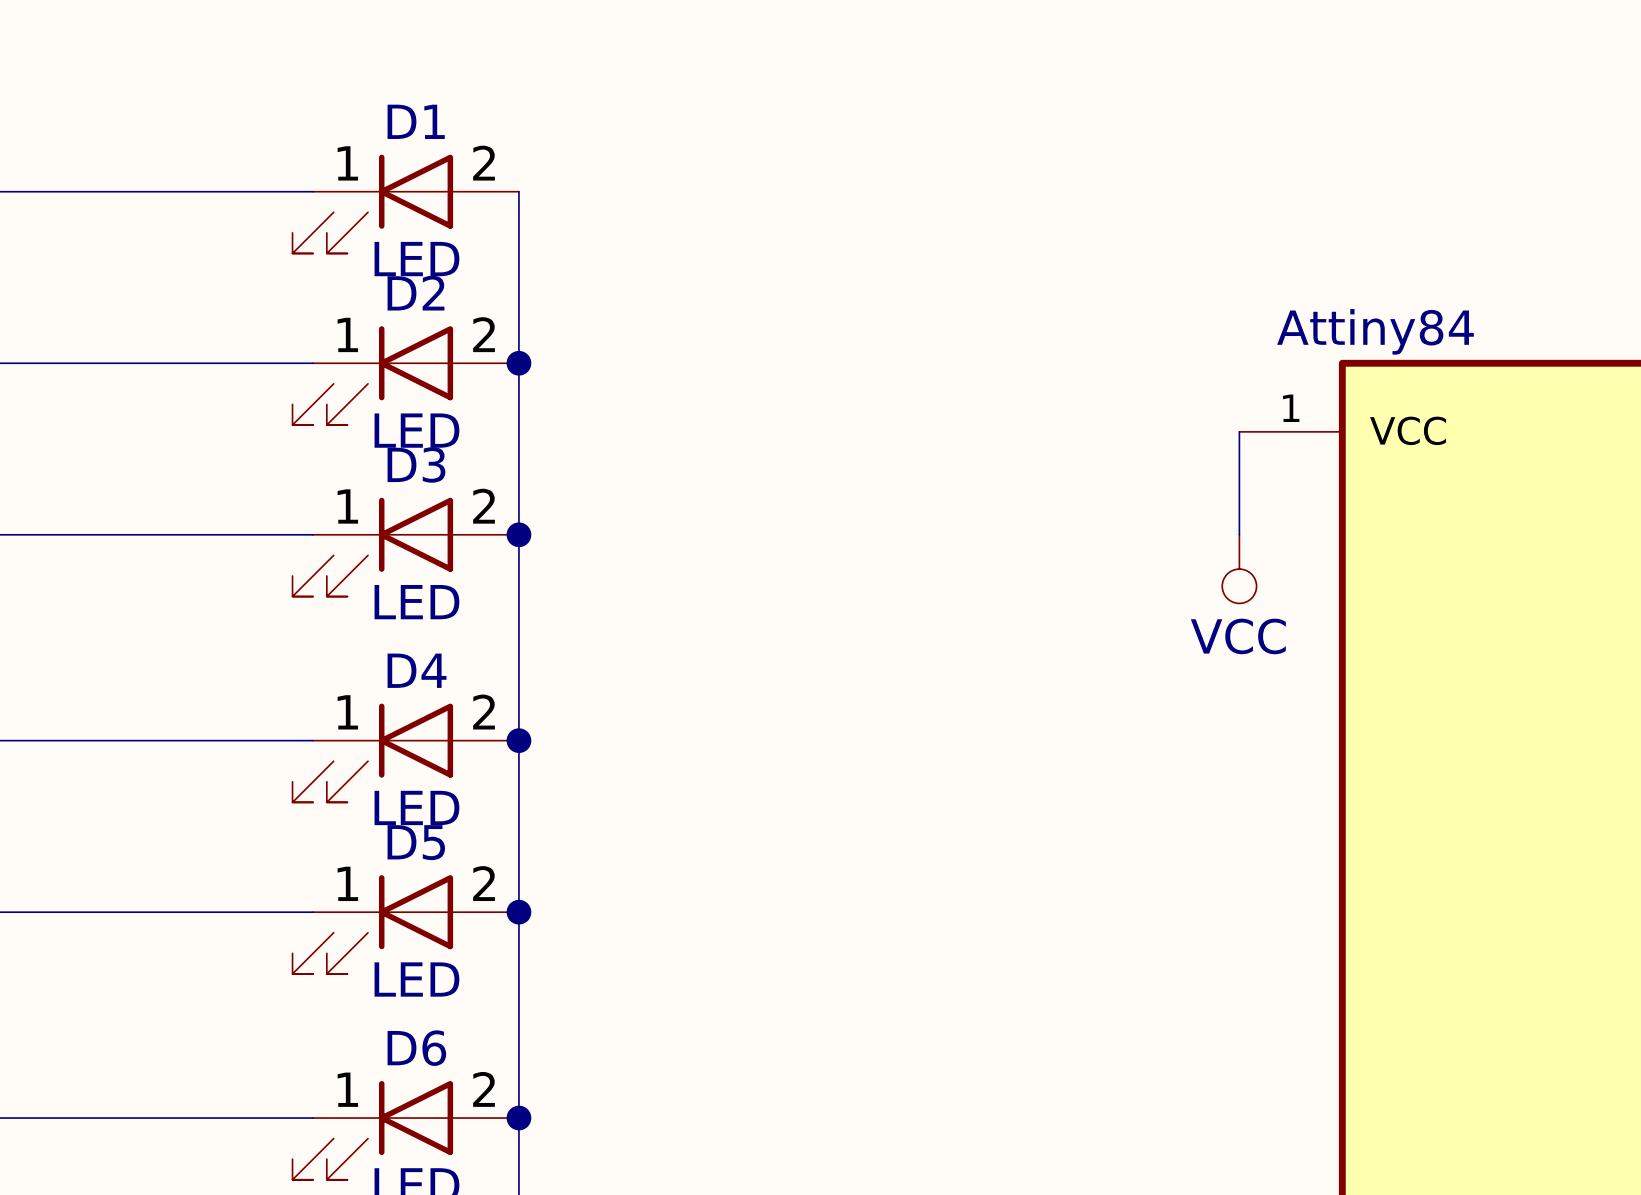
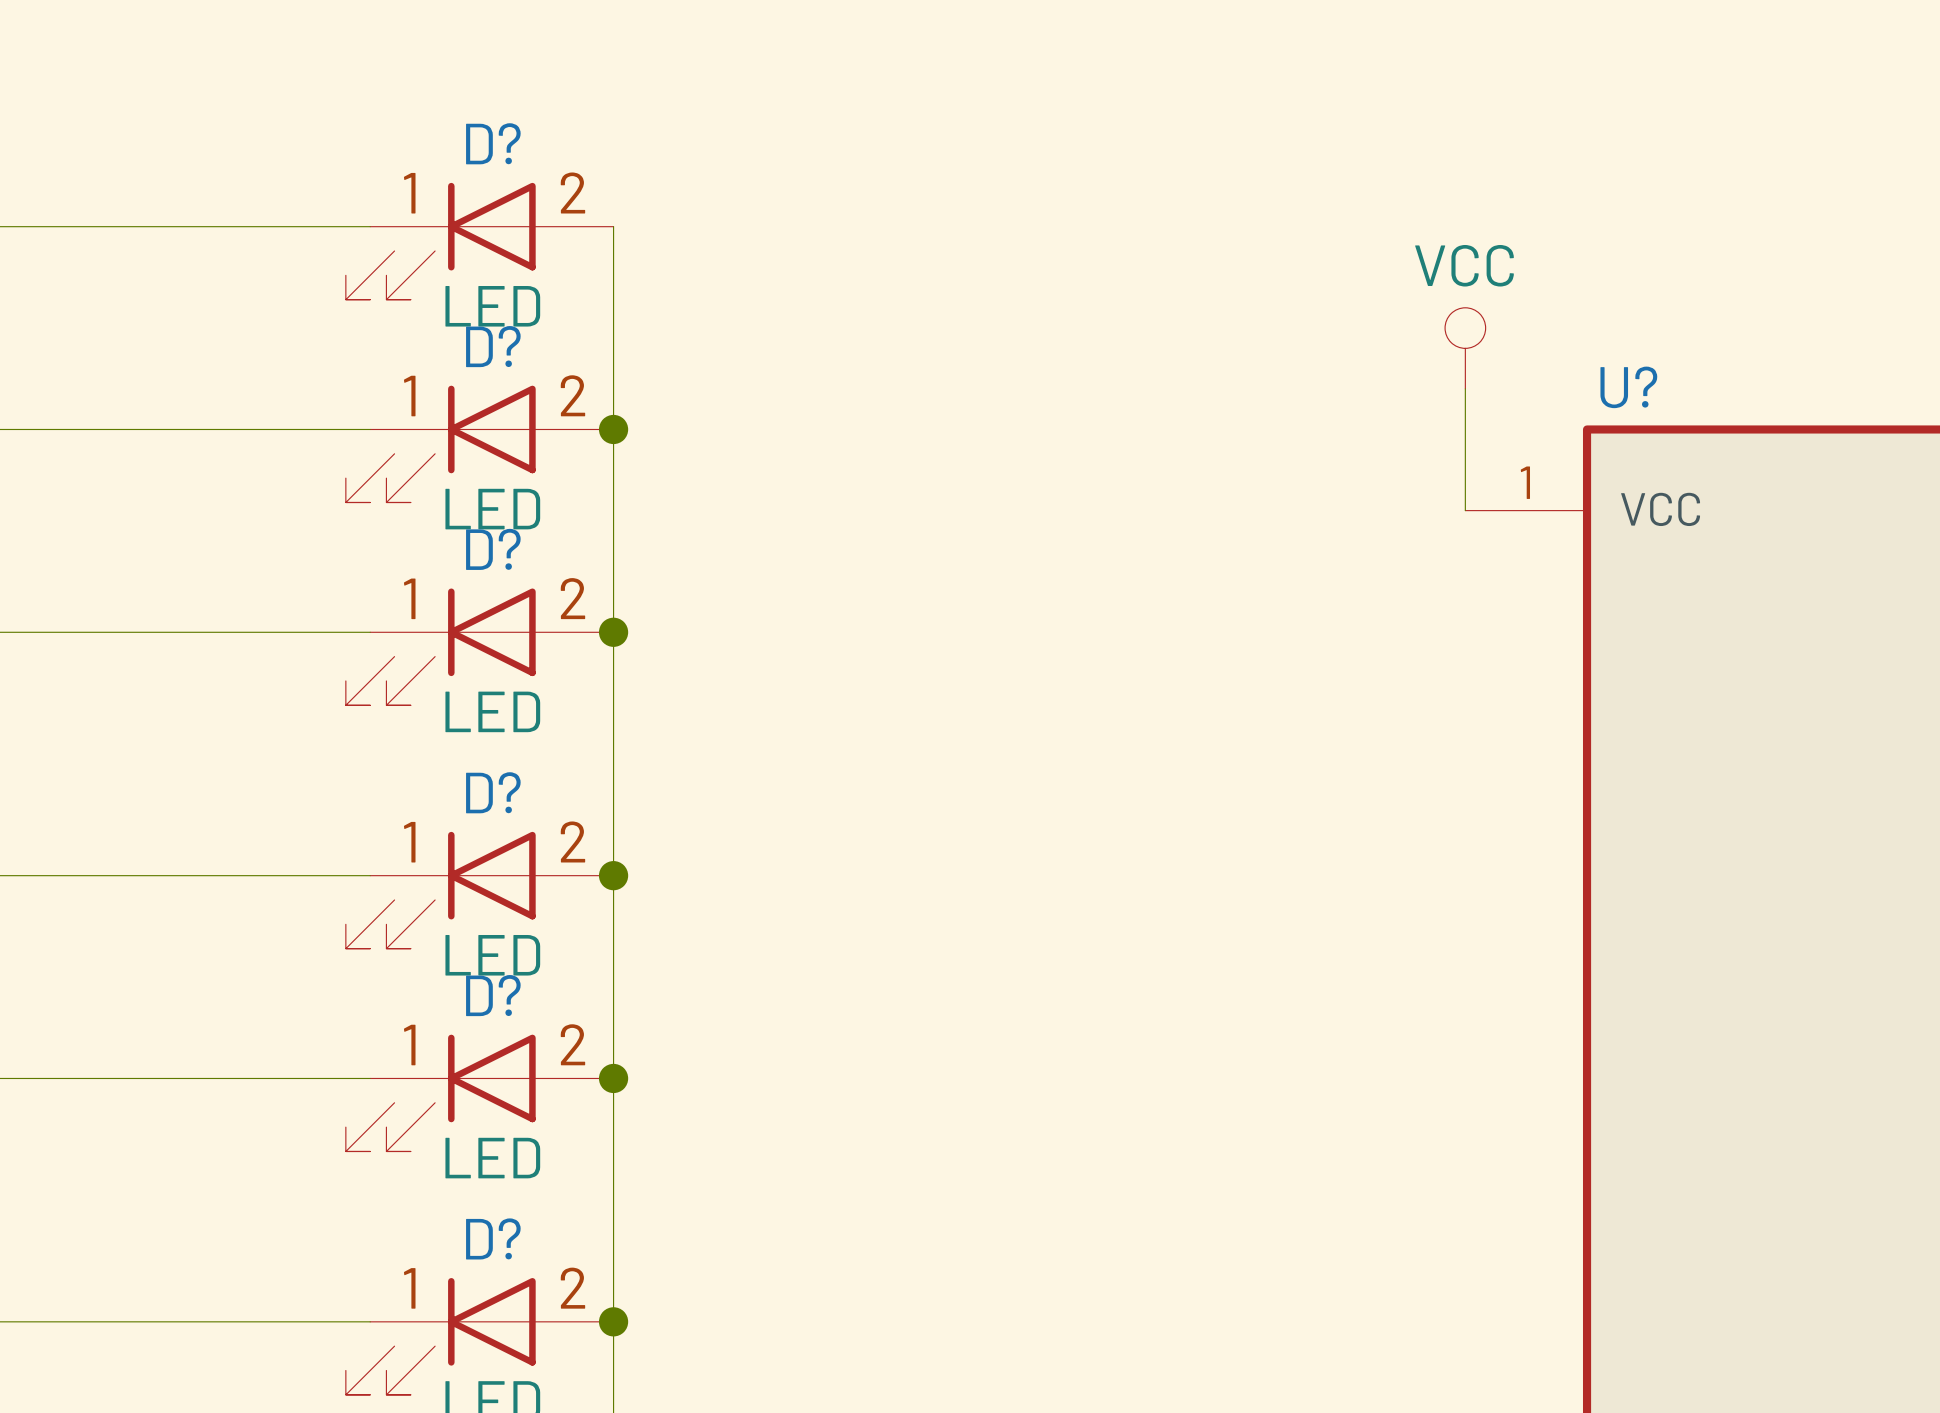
D1 name: D1 (416, 121) -> D? (493, 143)
D2 name: D2 (415, 293) -> D? (493, 346)
Attiny84 name: Attiny84 (1375, 331) -> U? (1628, 387)
wire: (1239, 431) (1239, 534) -> (1465, 510) (1465, 388)
D3 name: D3 (416, 464) -> D? (493, 549)
power symbol rotation: 0° (1239, 569) -> 180° (1465, 348)
power symbol position: VCC (1239, 569) -> VCC (1465, 348)
D4 name: D4 (417, 670) -> D? (493, 792)
D5 name: D5 (416, 842) -> D? (493, 995)
D6 name: D6 (416, 1048) -> D? (493, 1238)

